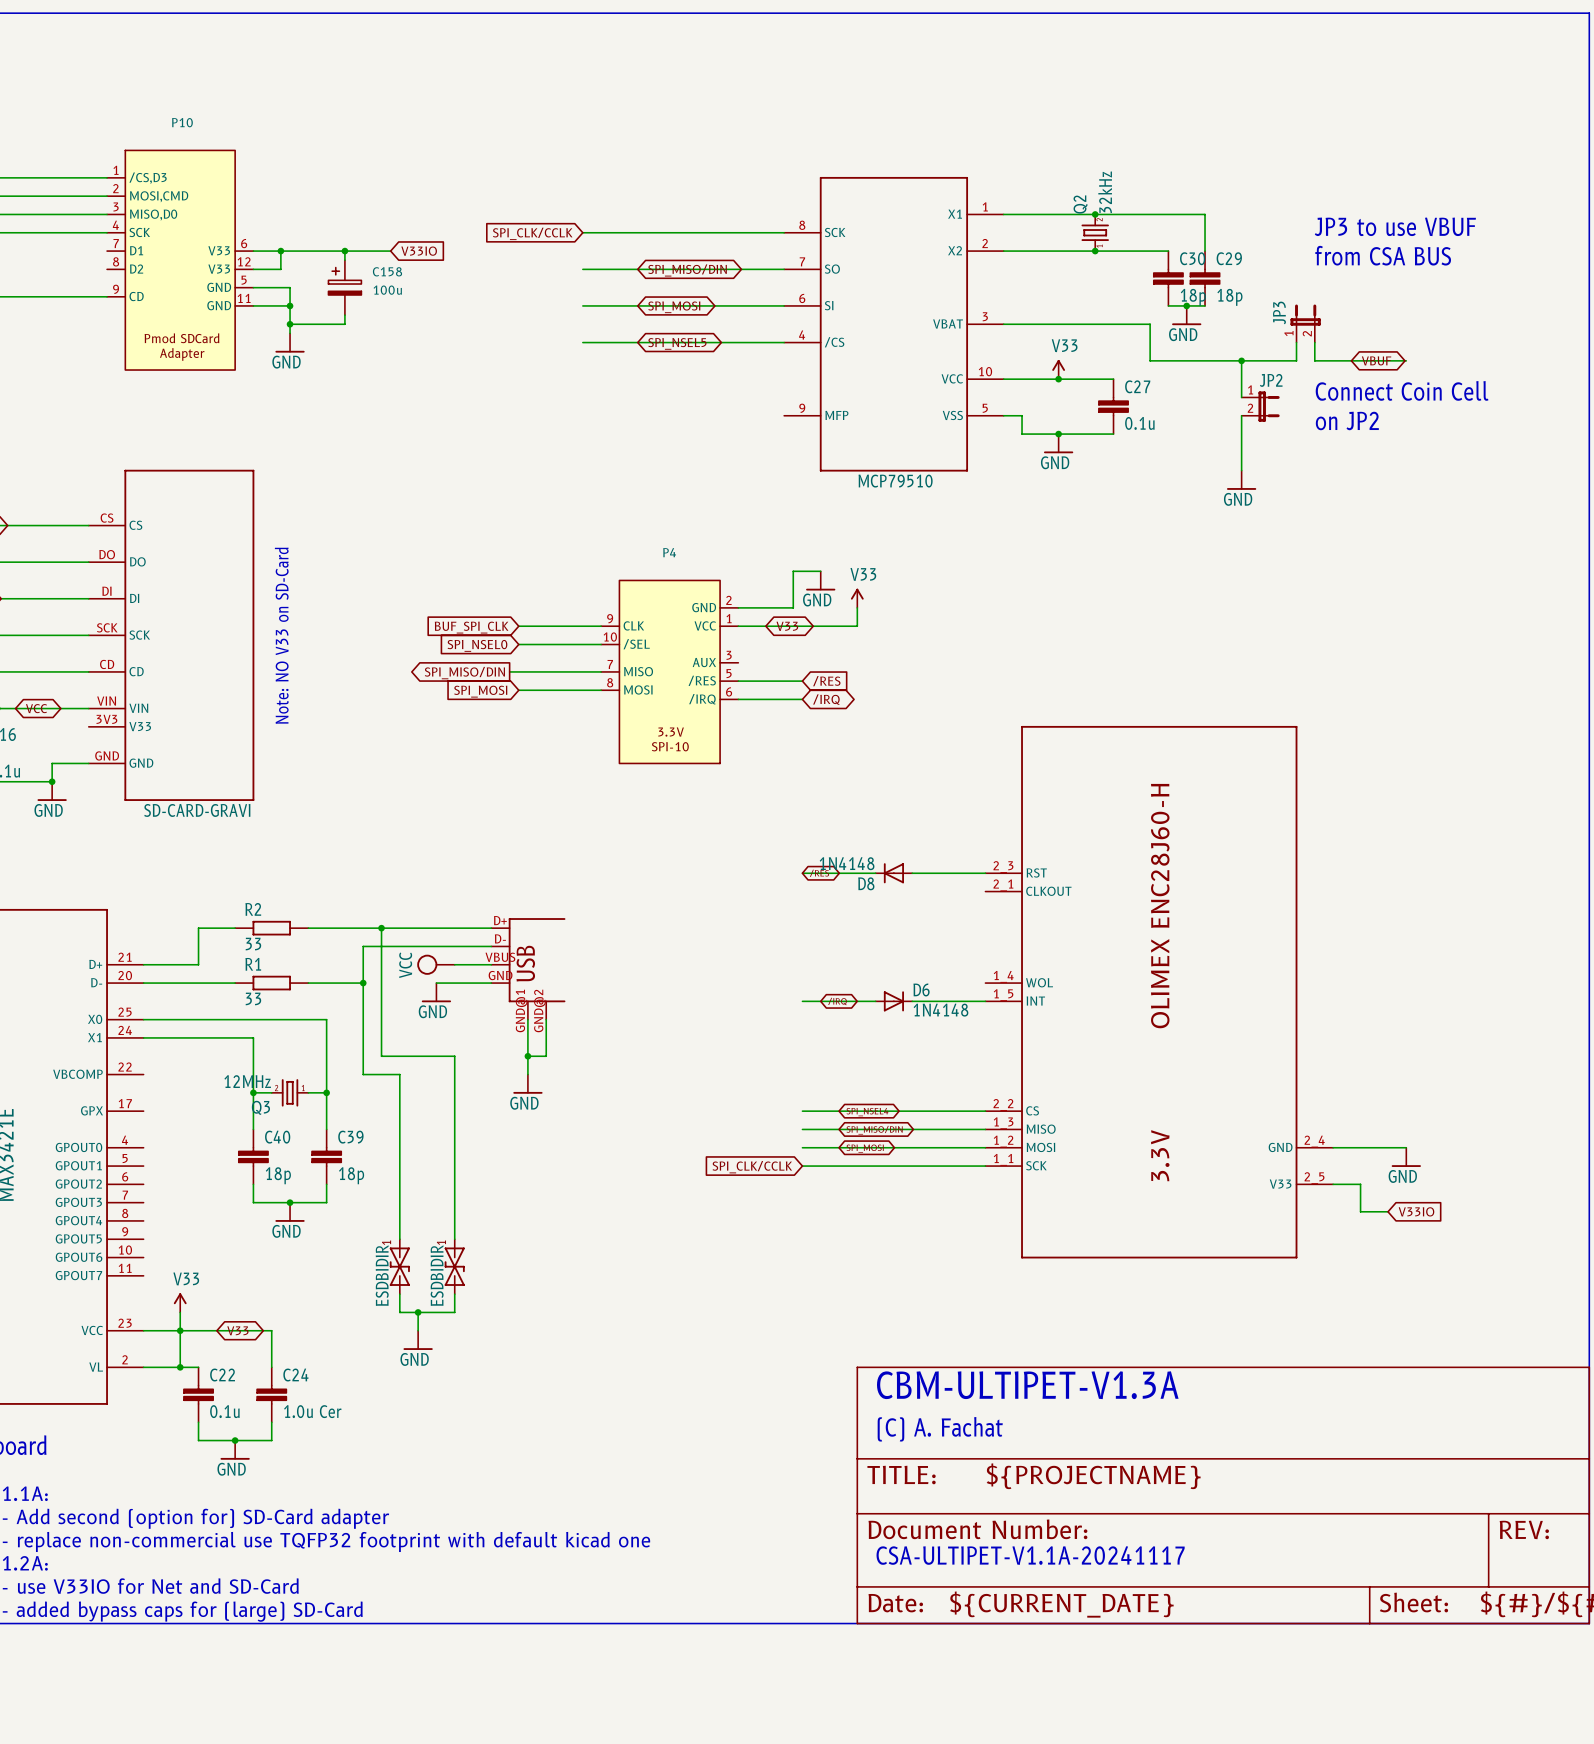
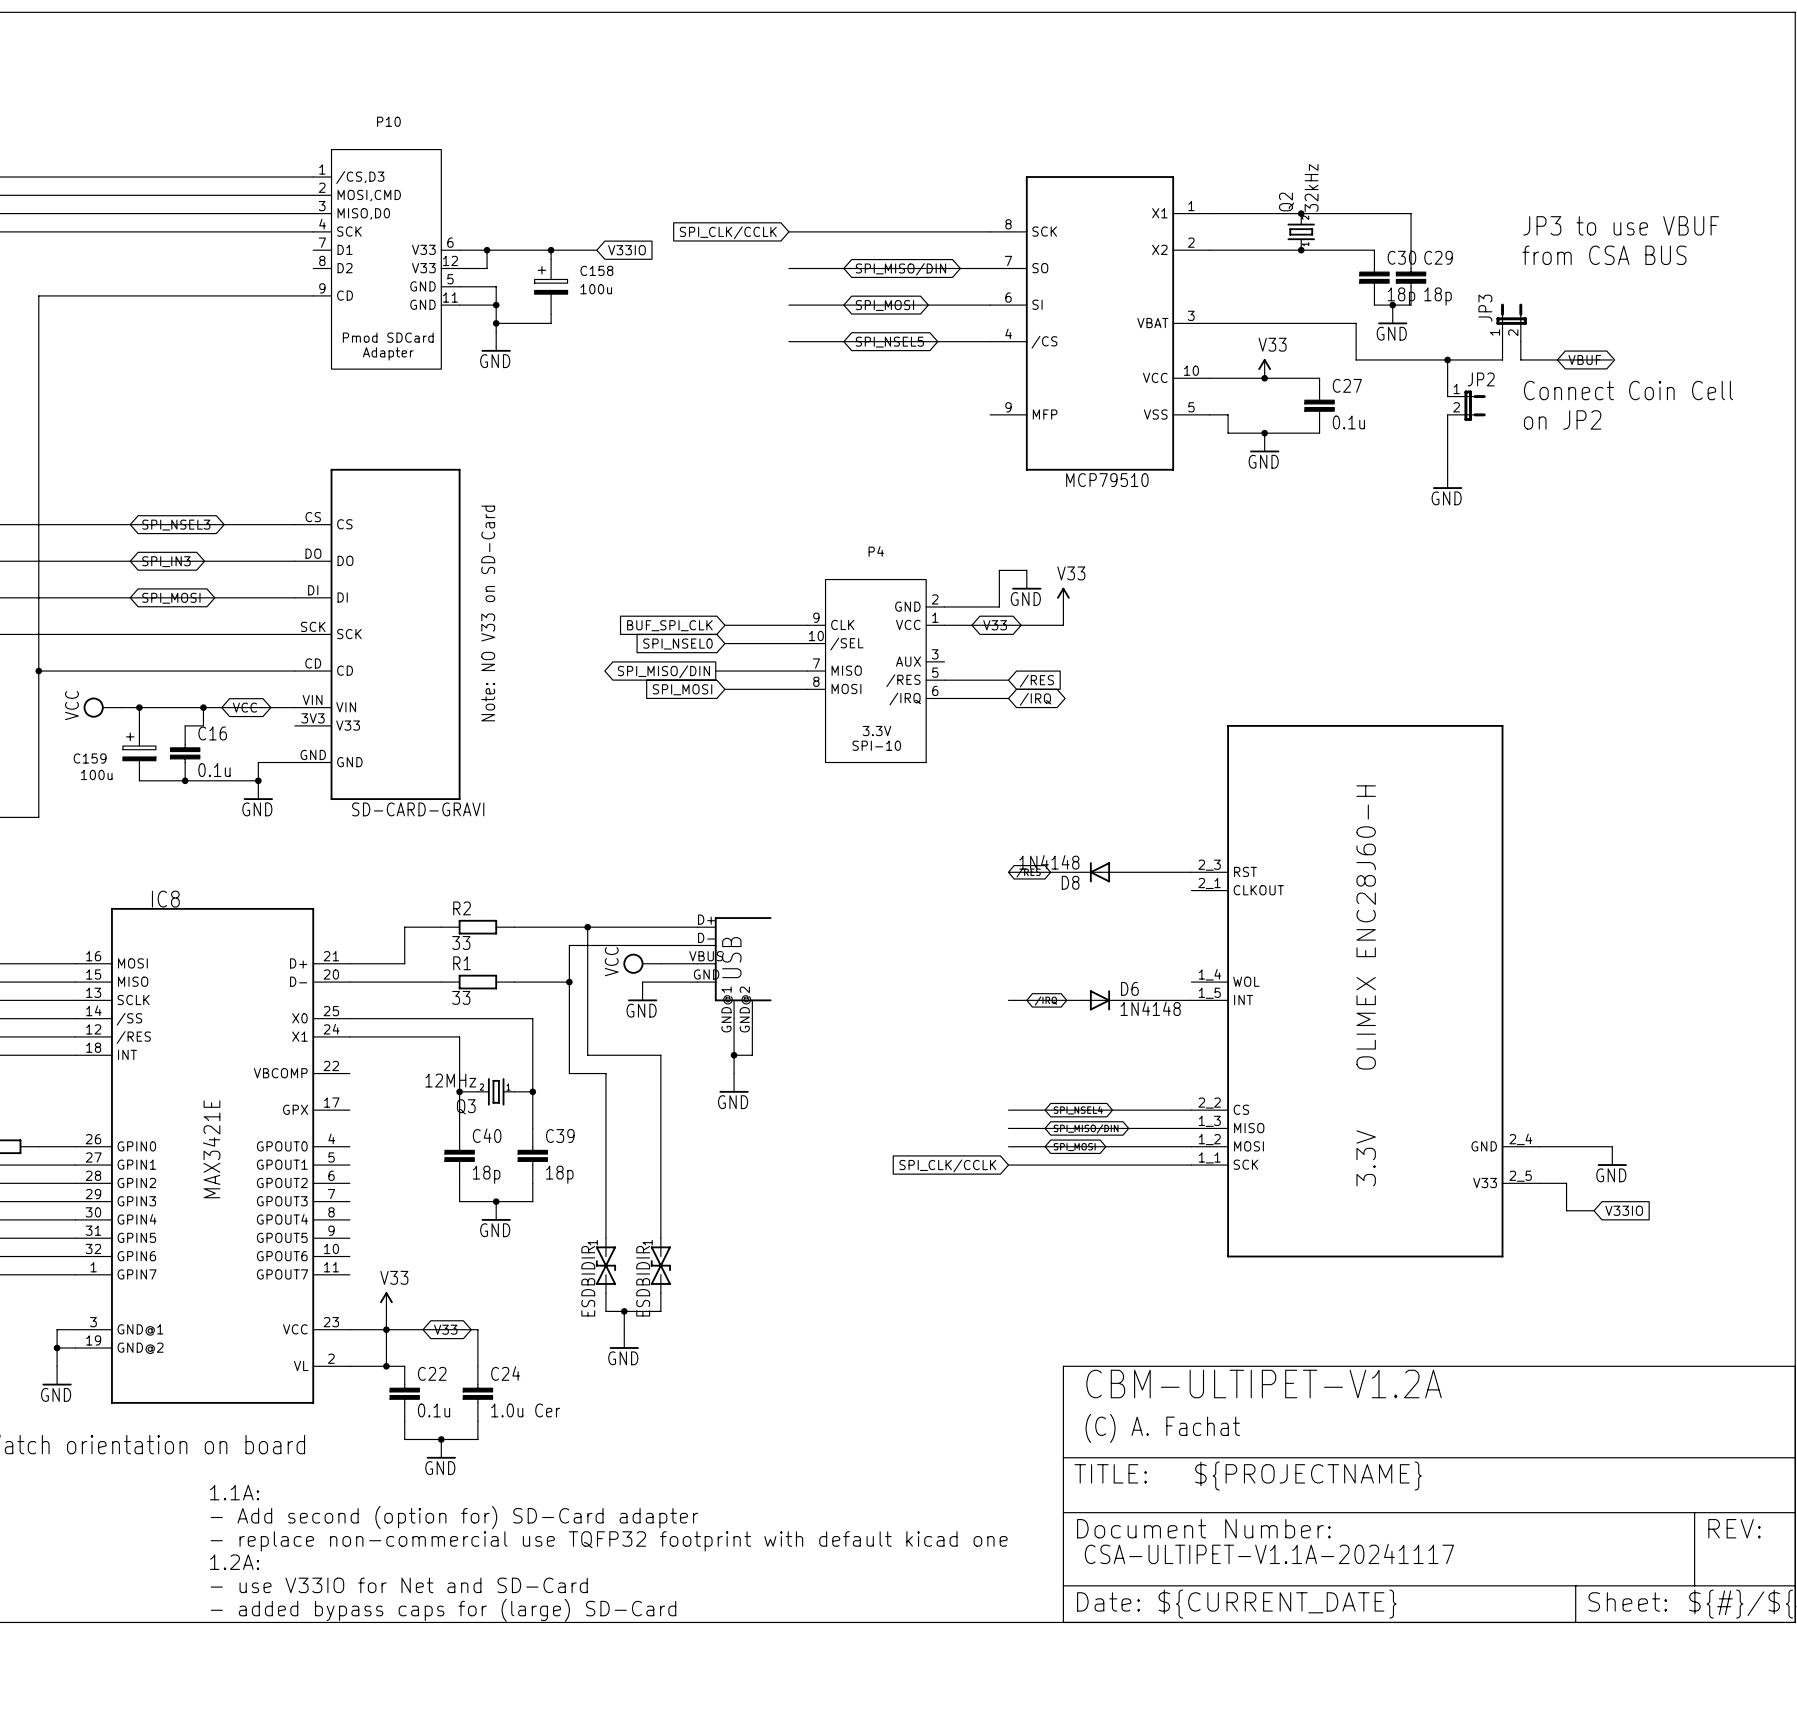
text: CBM-ULTIPET-V1.3A (1027, 1385) -> CBM-ULTIPET-V1.2A (1264, 1384)

